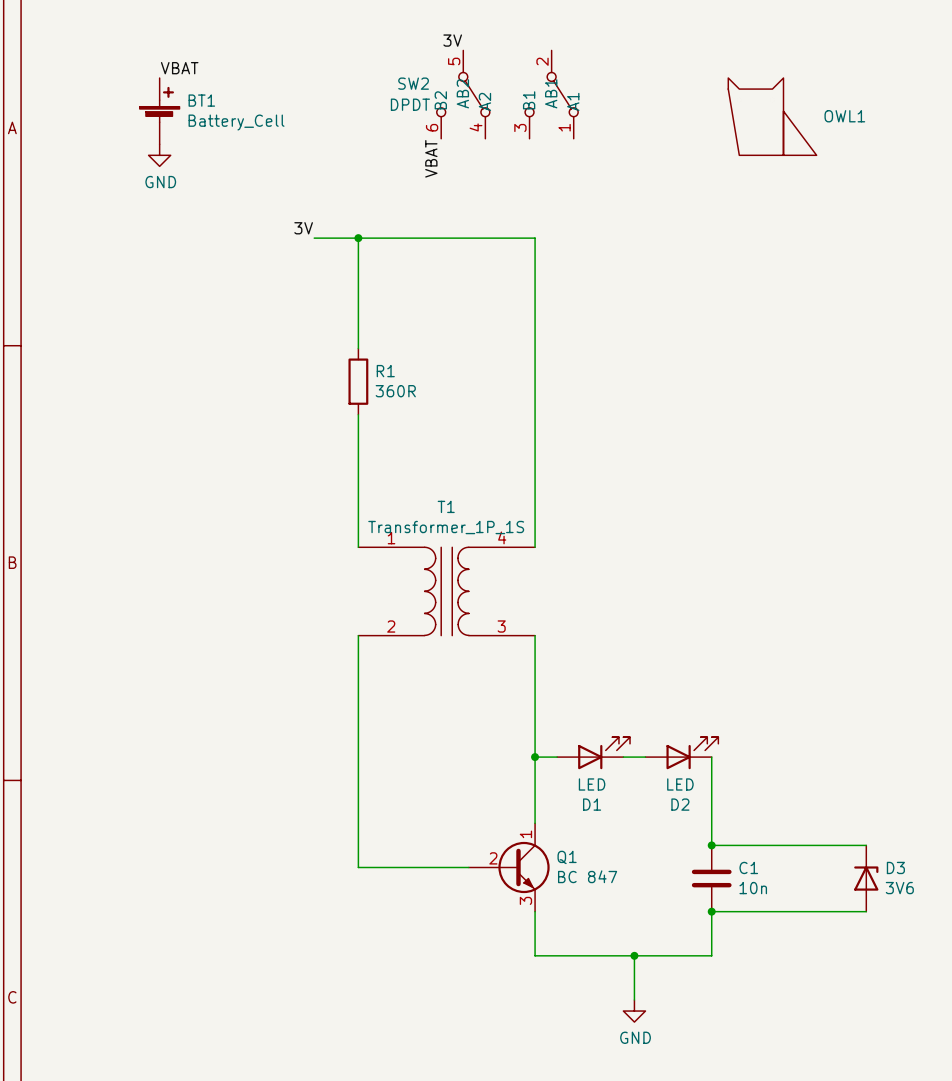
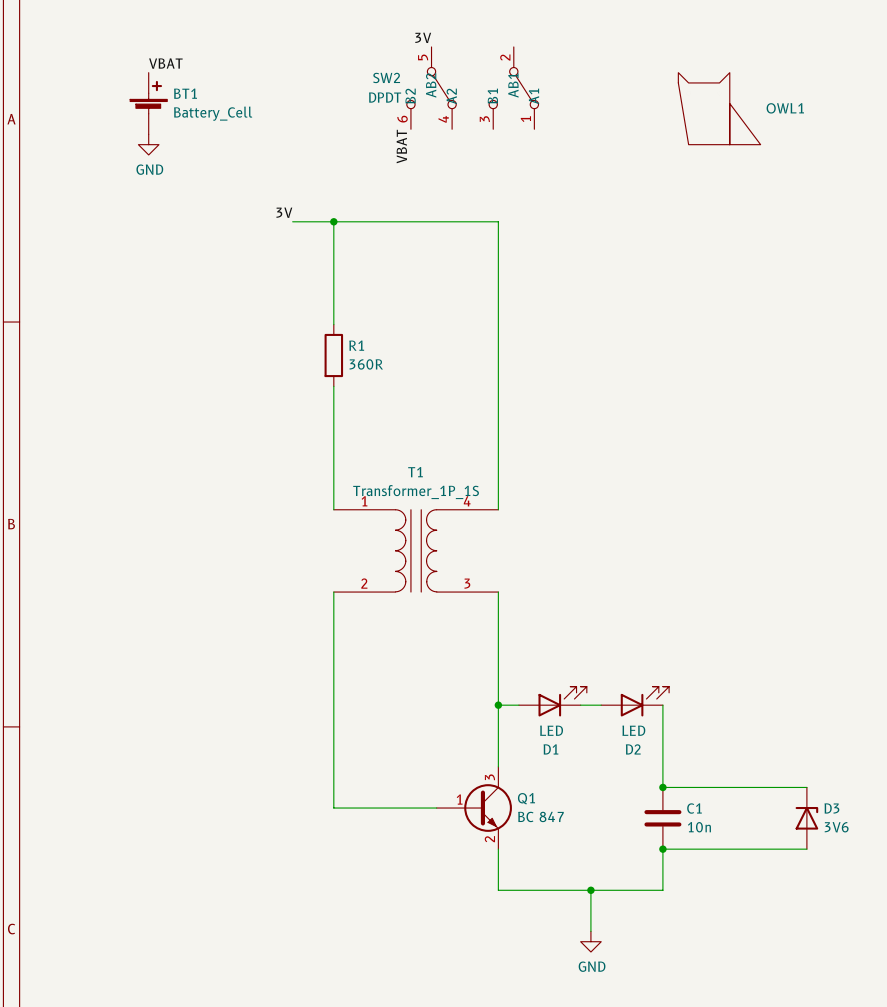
Q1 pin number: 1 (525, 834) -> 3 (489, 777)
Q1 pin number: 2 (493, 858) -> 1 (459, 799)
Q1 pin number: 3 (525, 900) -> 2 (489, 839)

